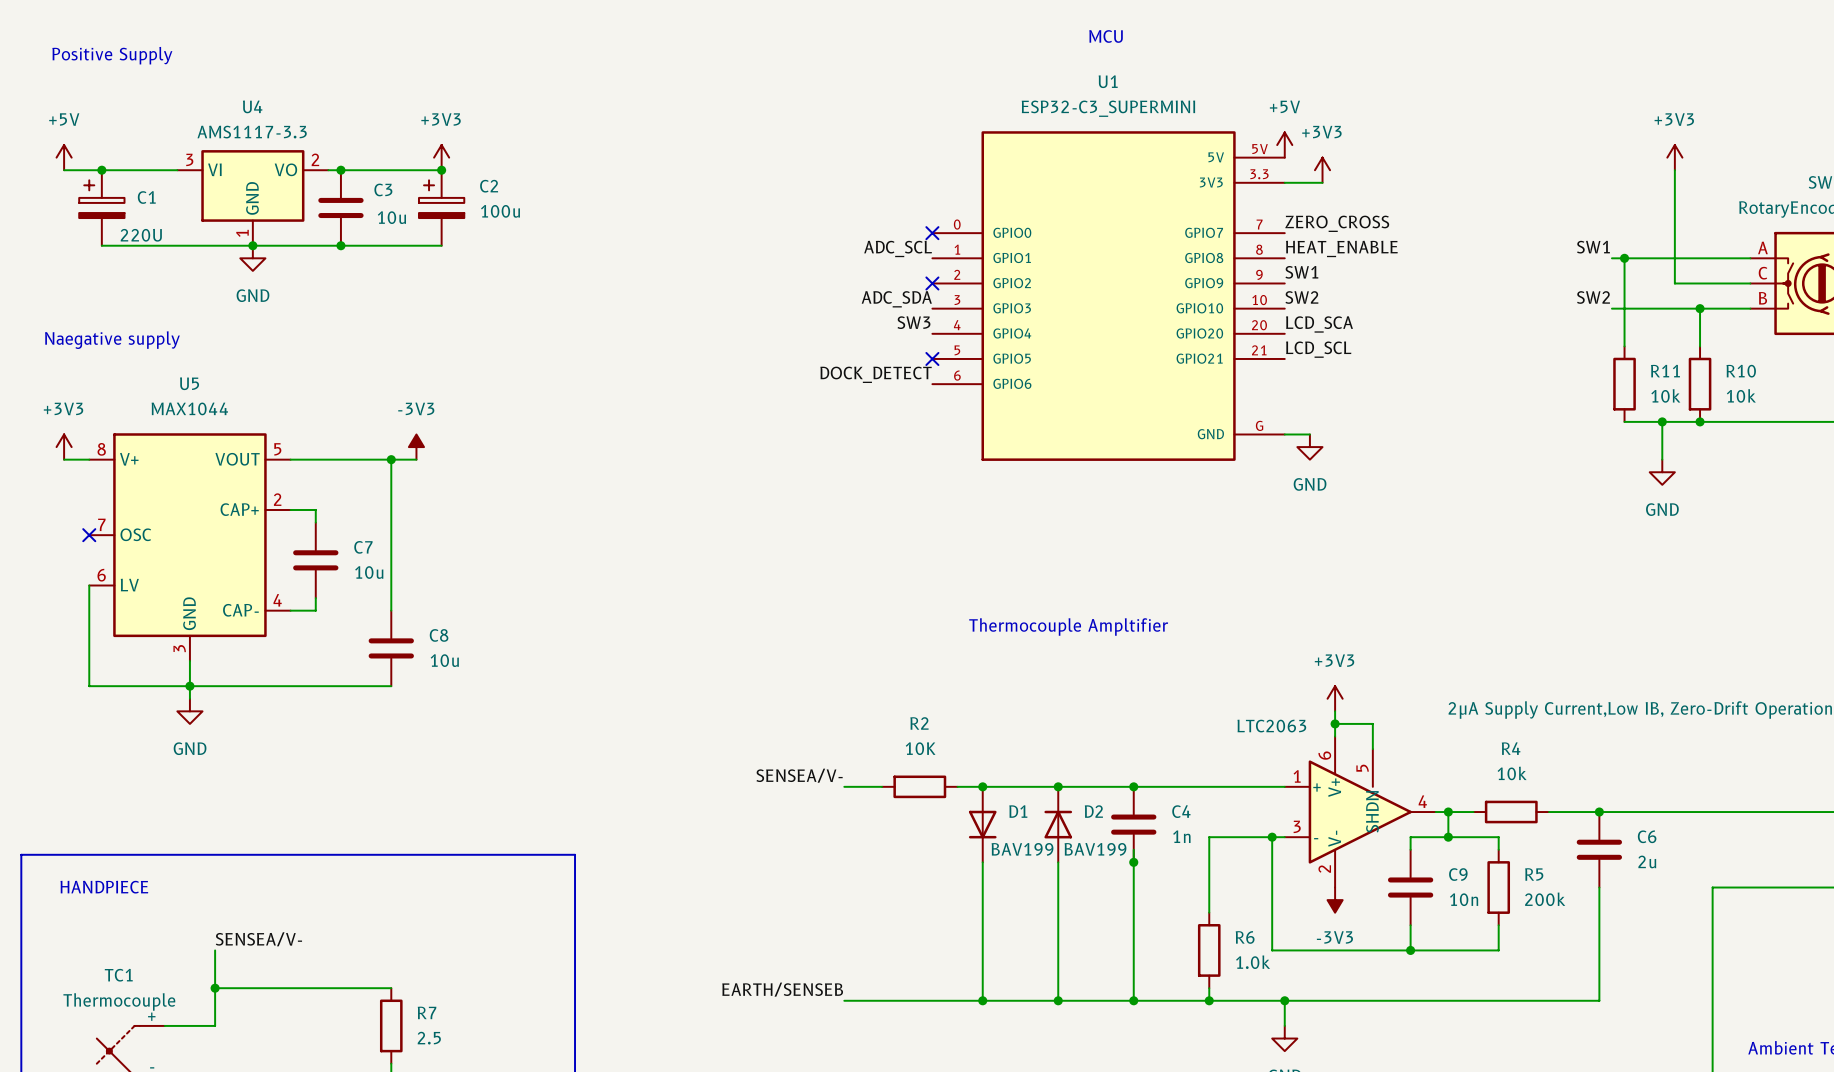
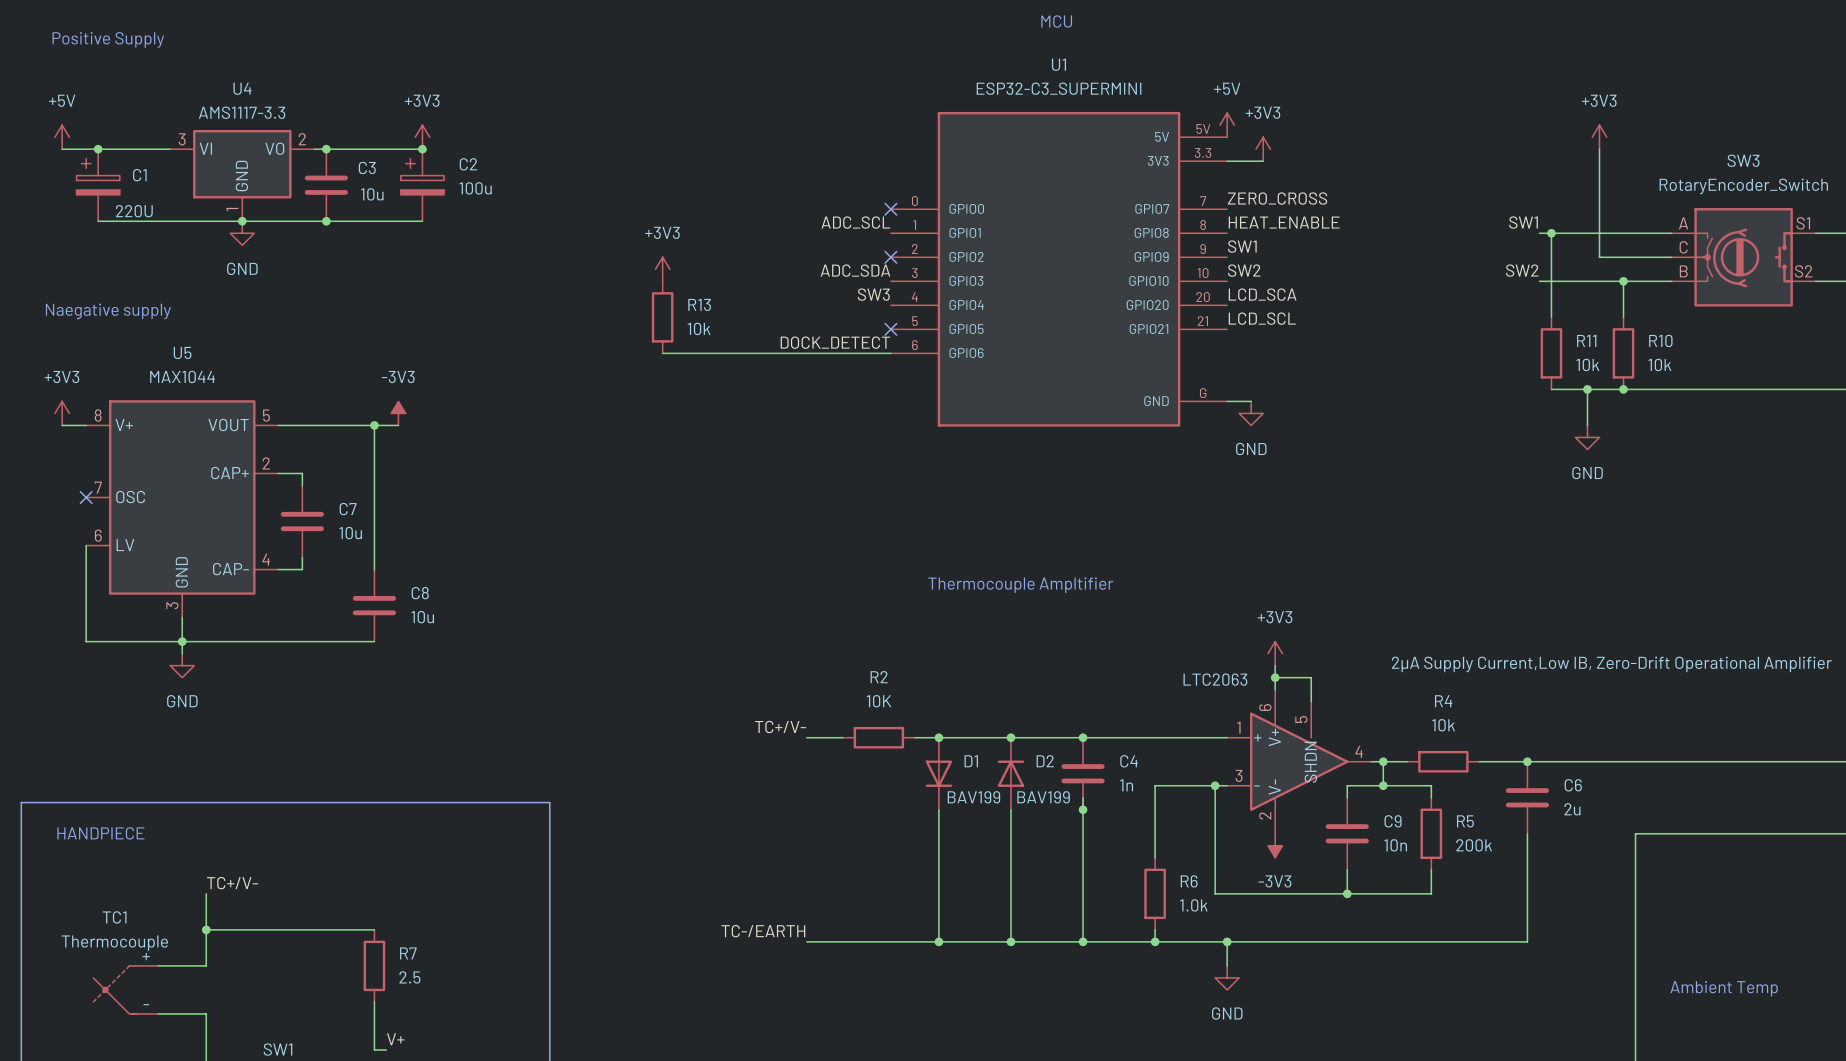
power symbol: none -> +3V3 (662, 269)
R13: none -> 10k (662, 317)
wire: none -> (662, 353) (890, 353)
label: SENSEA/V- (799, 775) -> TC+/V- (780, 727)
label: SENSEA/V- (258, 939) -> TC+/V- (232, 883)
label: EARTH/SENSEB (782, 989) -> TC-/EARTH (763, 931)

